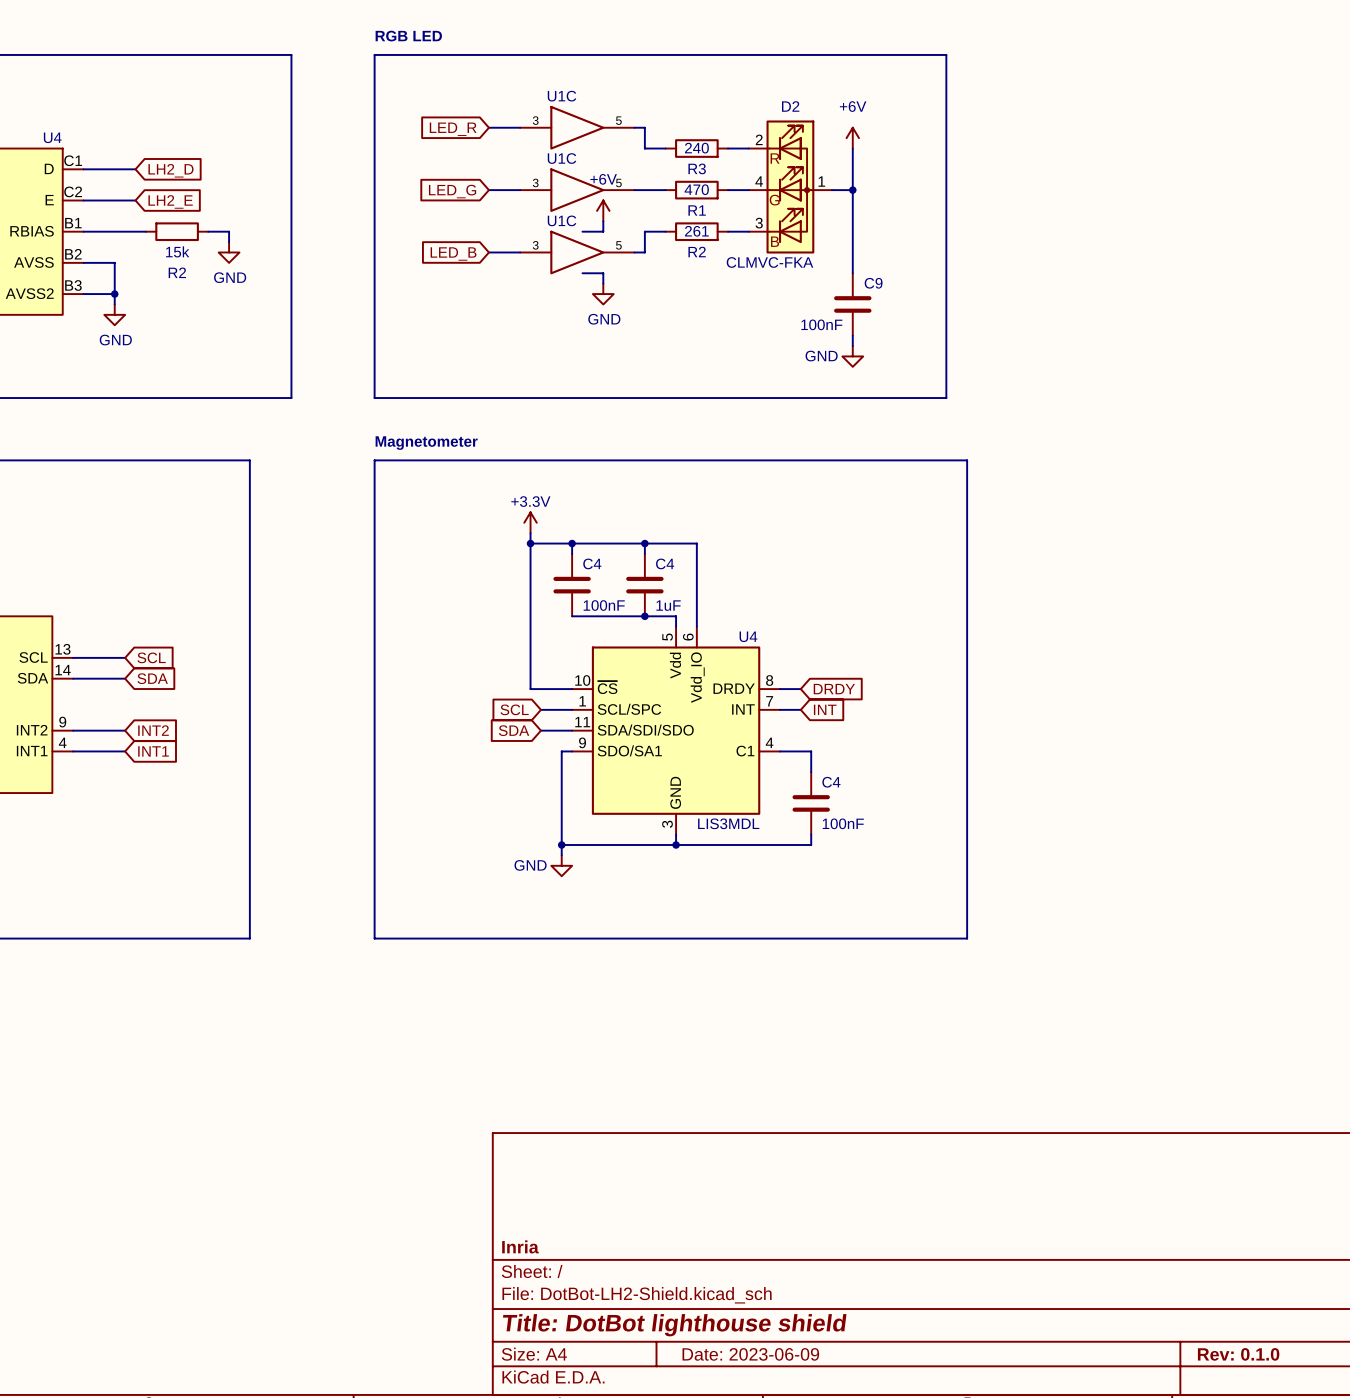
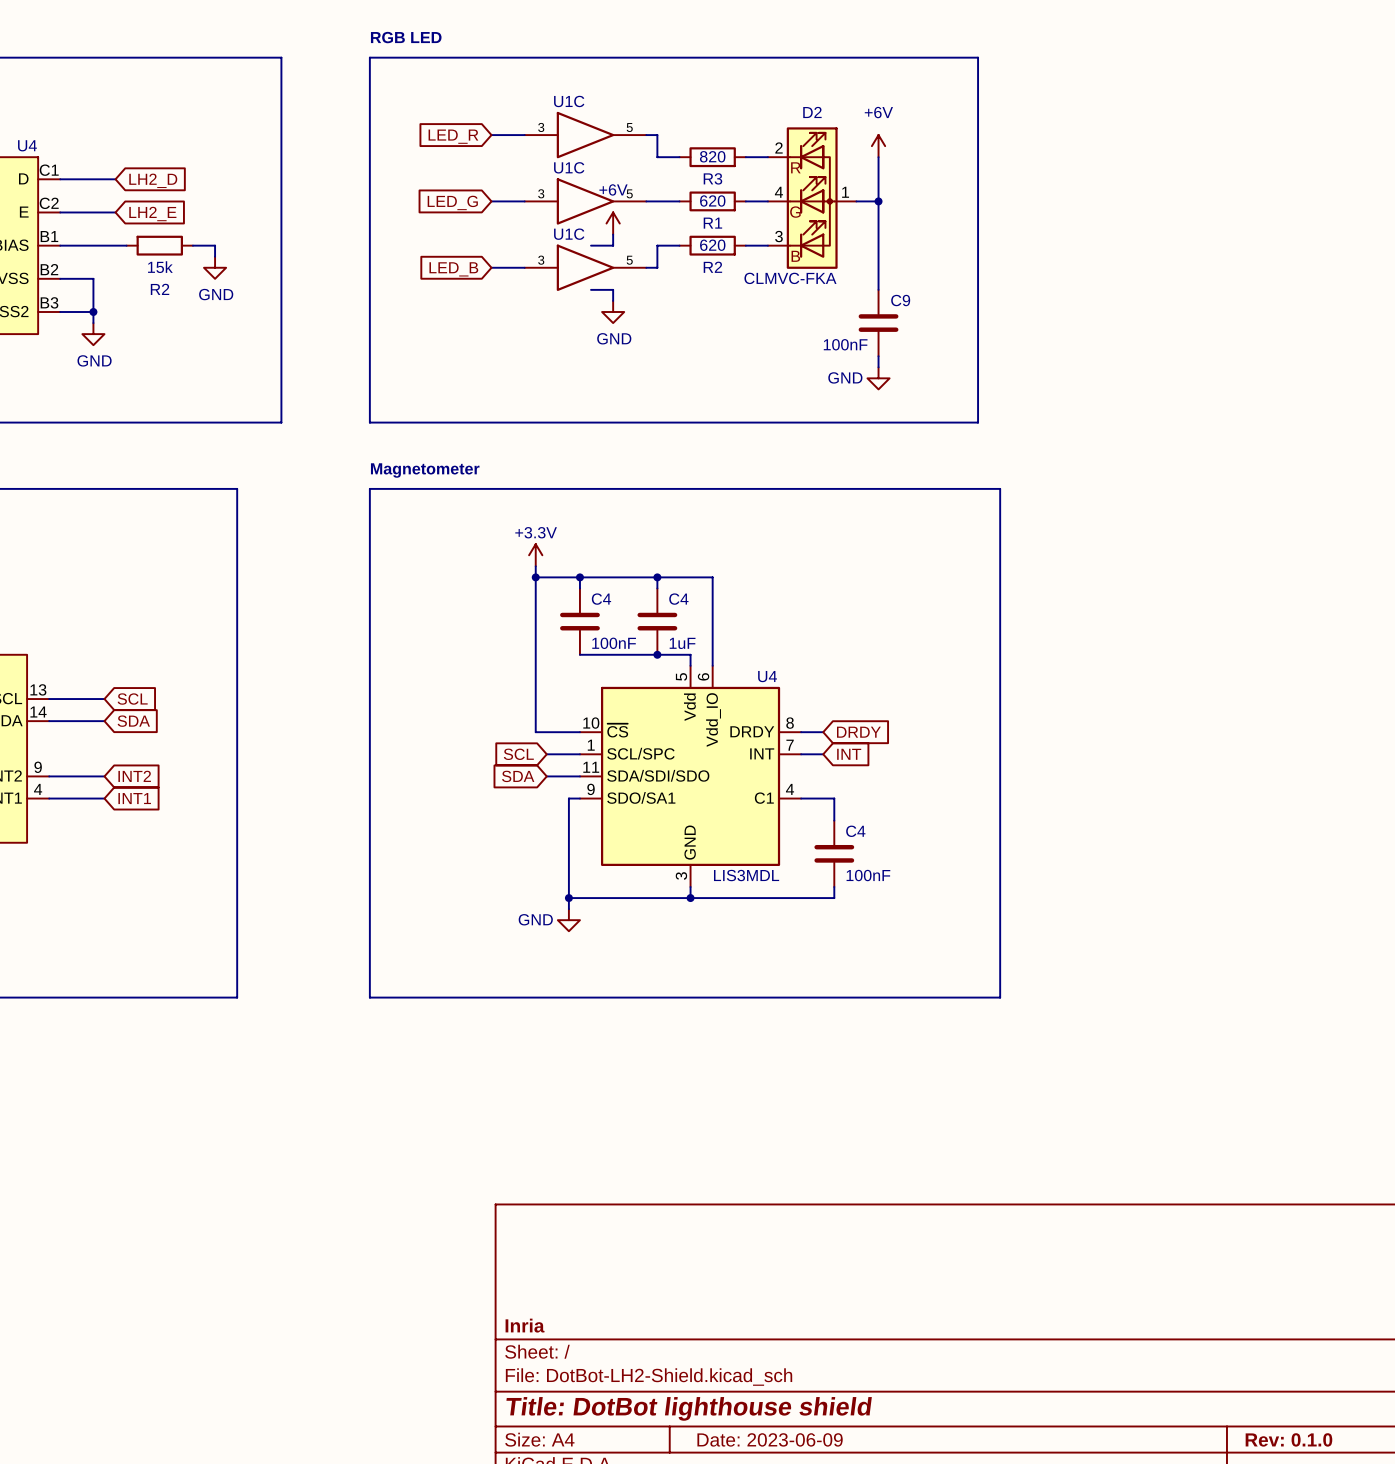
R3 value: 240 (696, 148) -> 820 (712, 156)
R1 value: 470 (696, 189) -> 620 (712, 201)
R2 value: 261 (696, 231) -> 620 (712, 245)

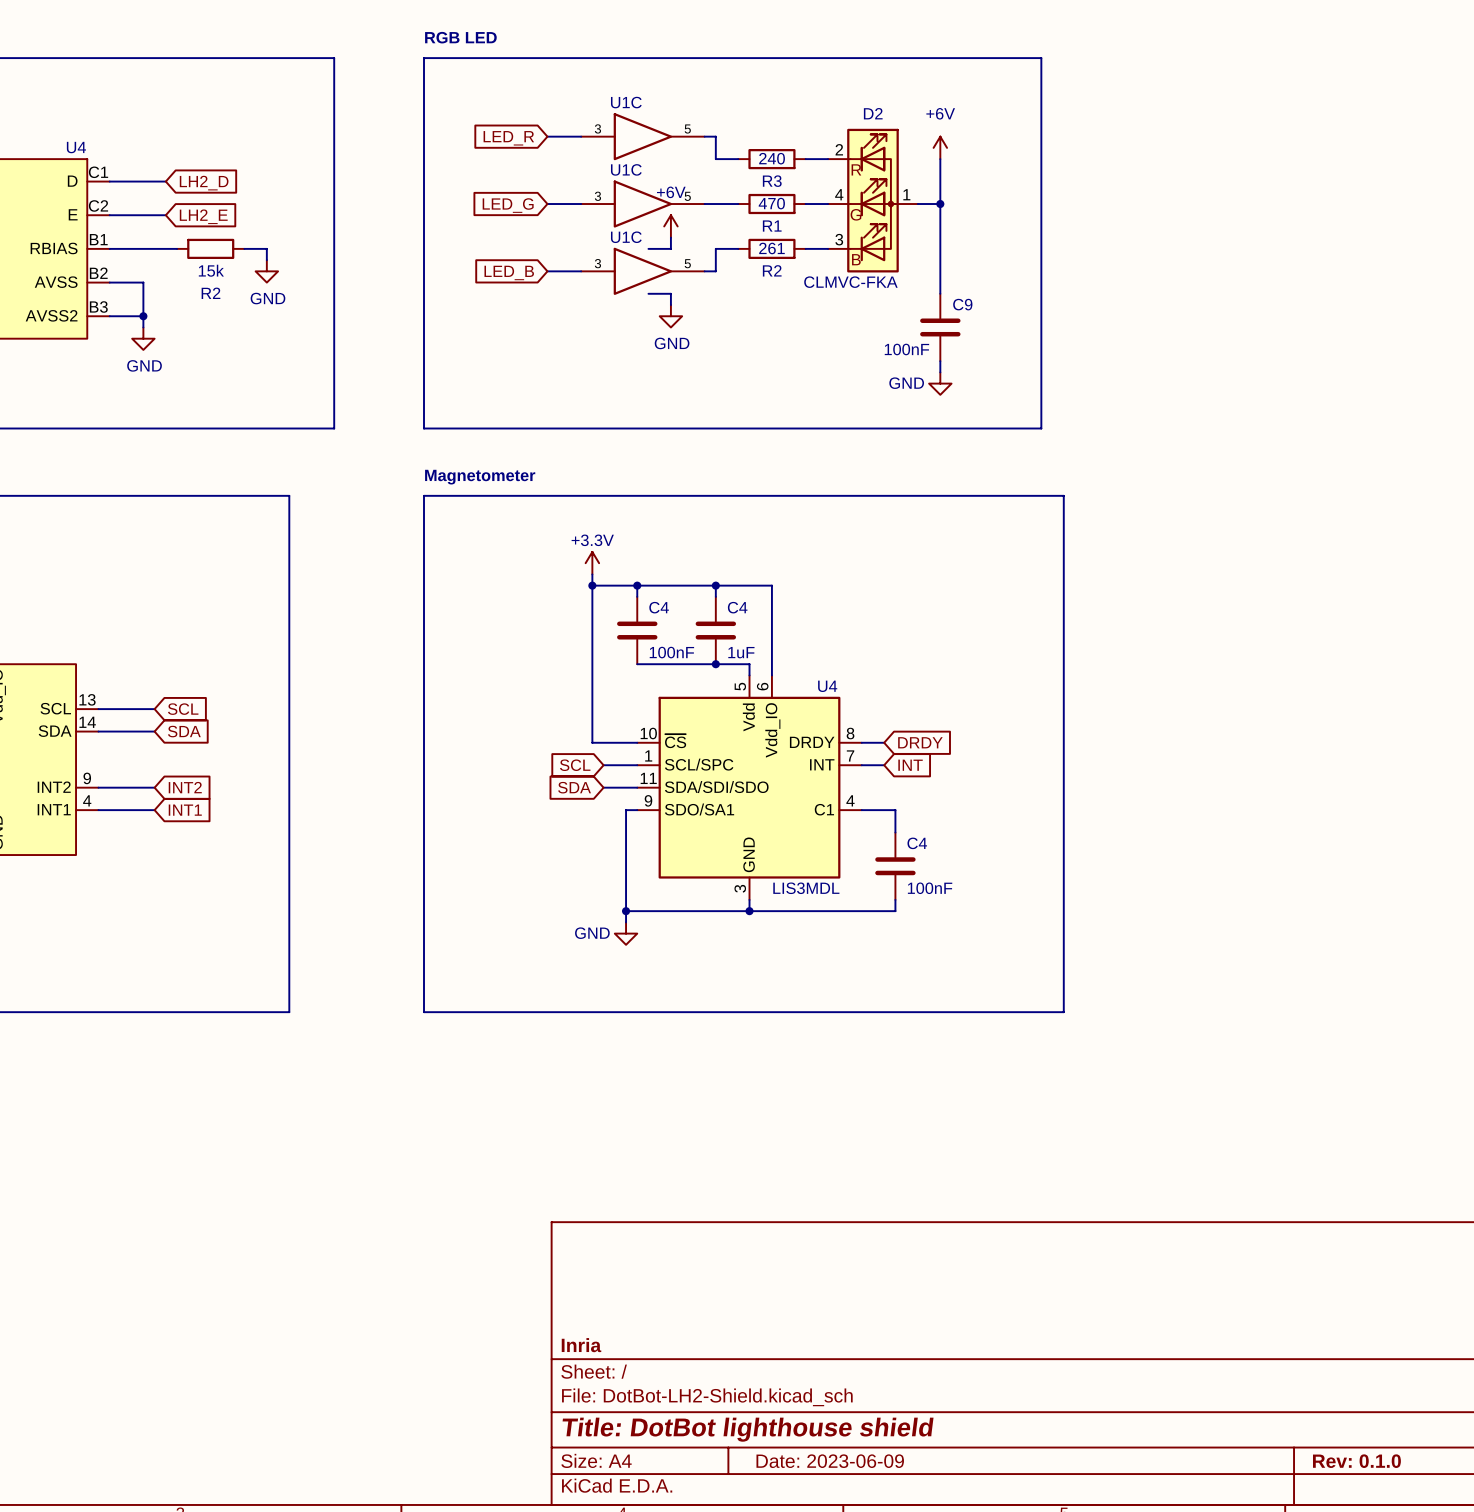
R3 value: 820 (712, 156) -> 240 (772, 158)
R1 value: 620 (712, 201) -> 470 (771, 203)
R2 value: 620 (712, 245) -> 261 (771, 248)

